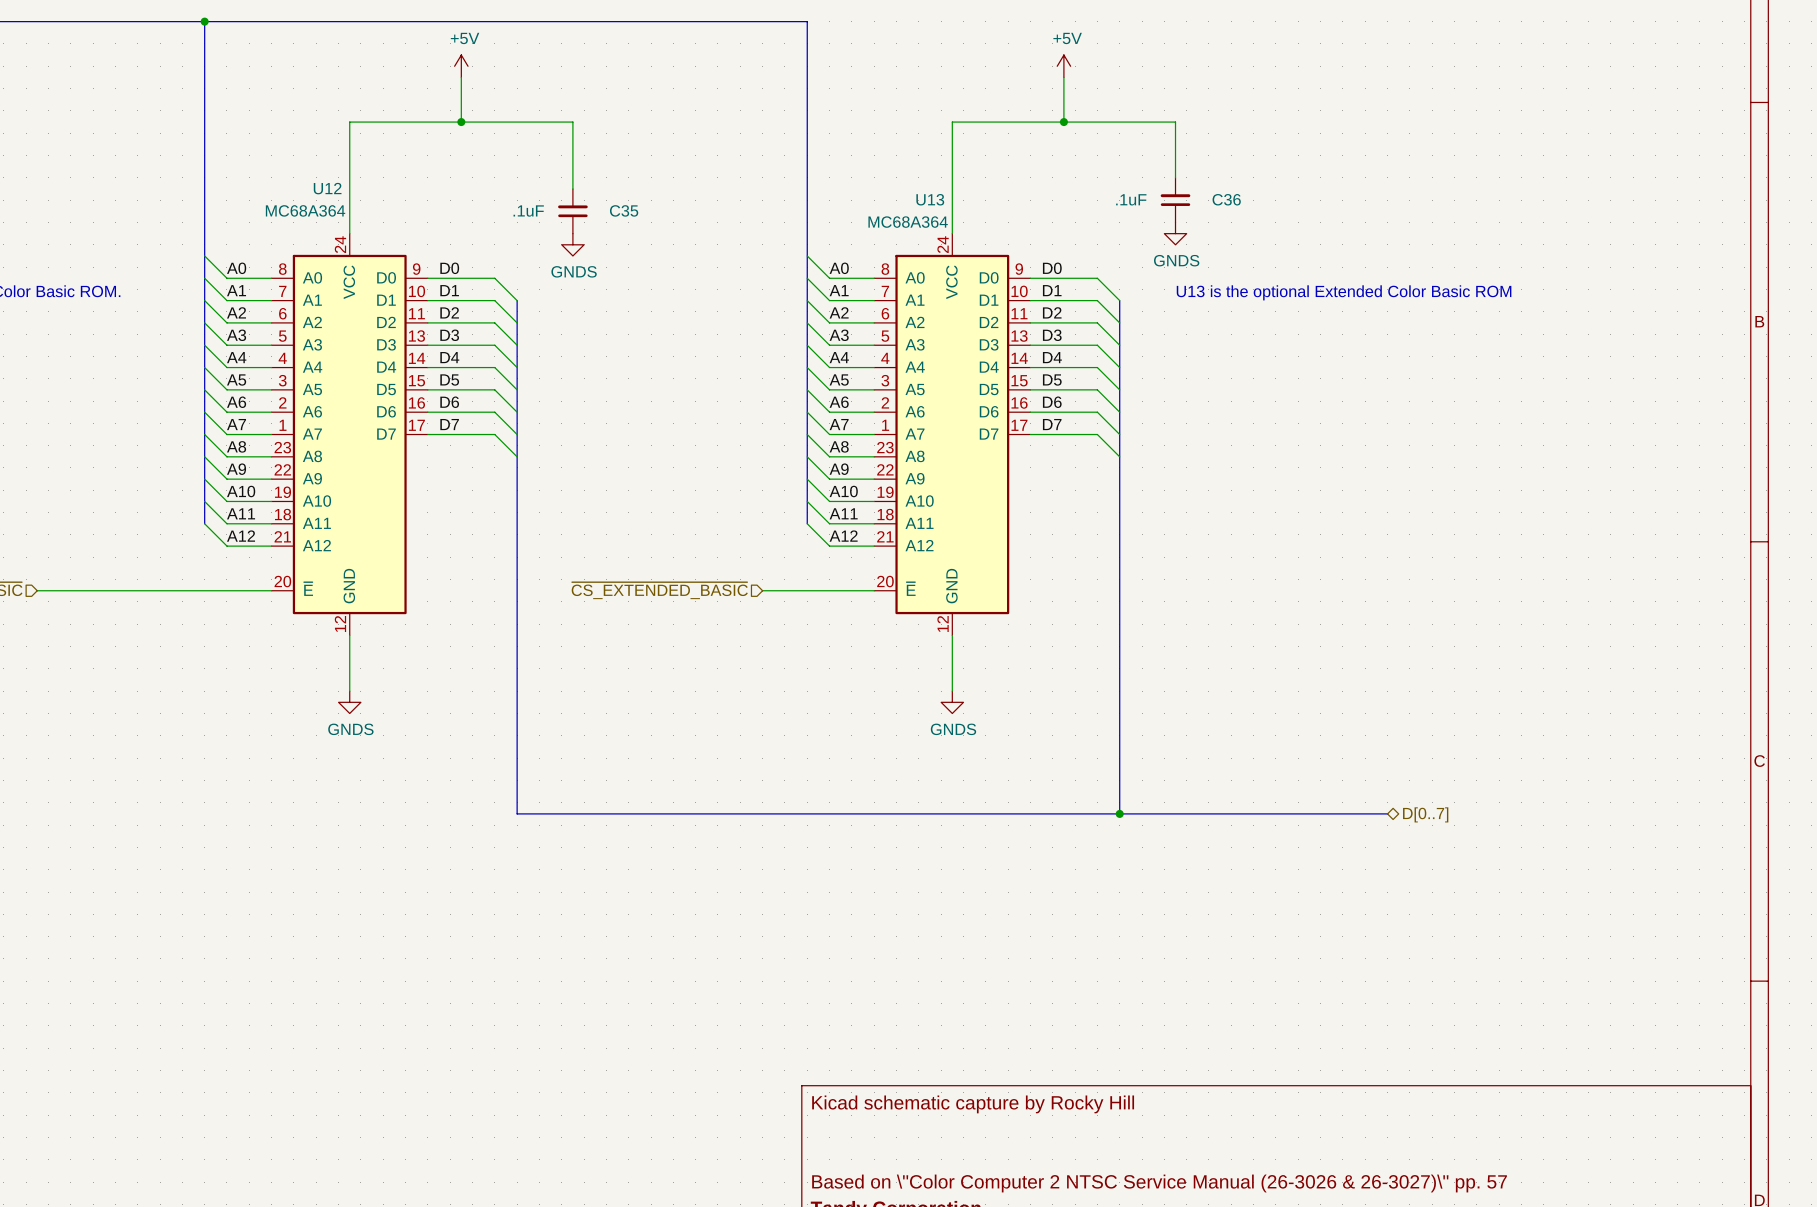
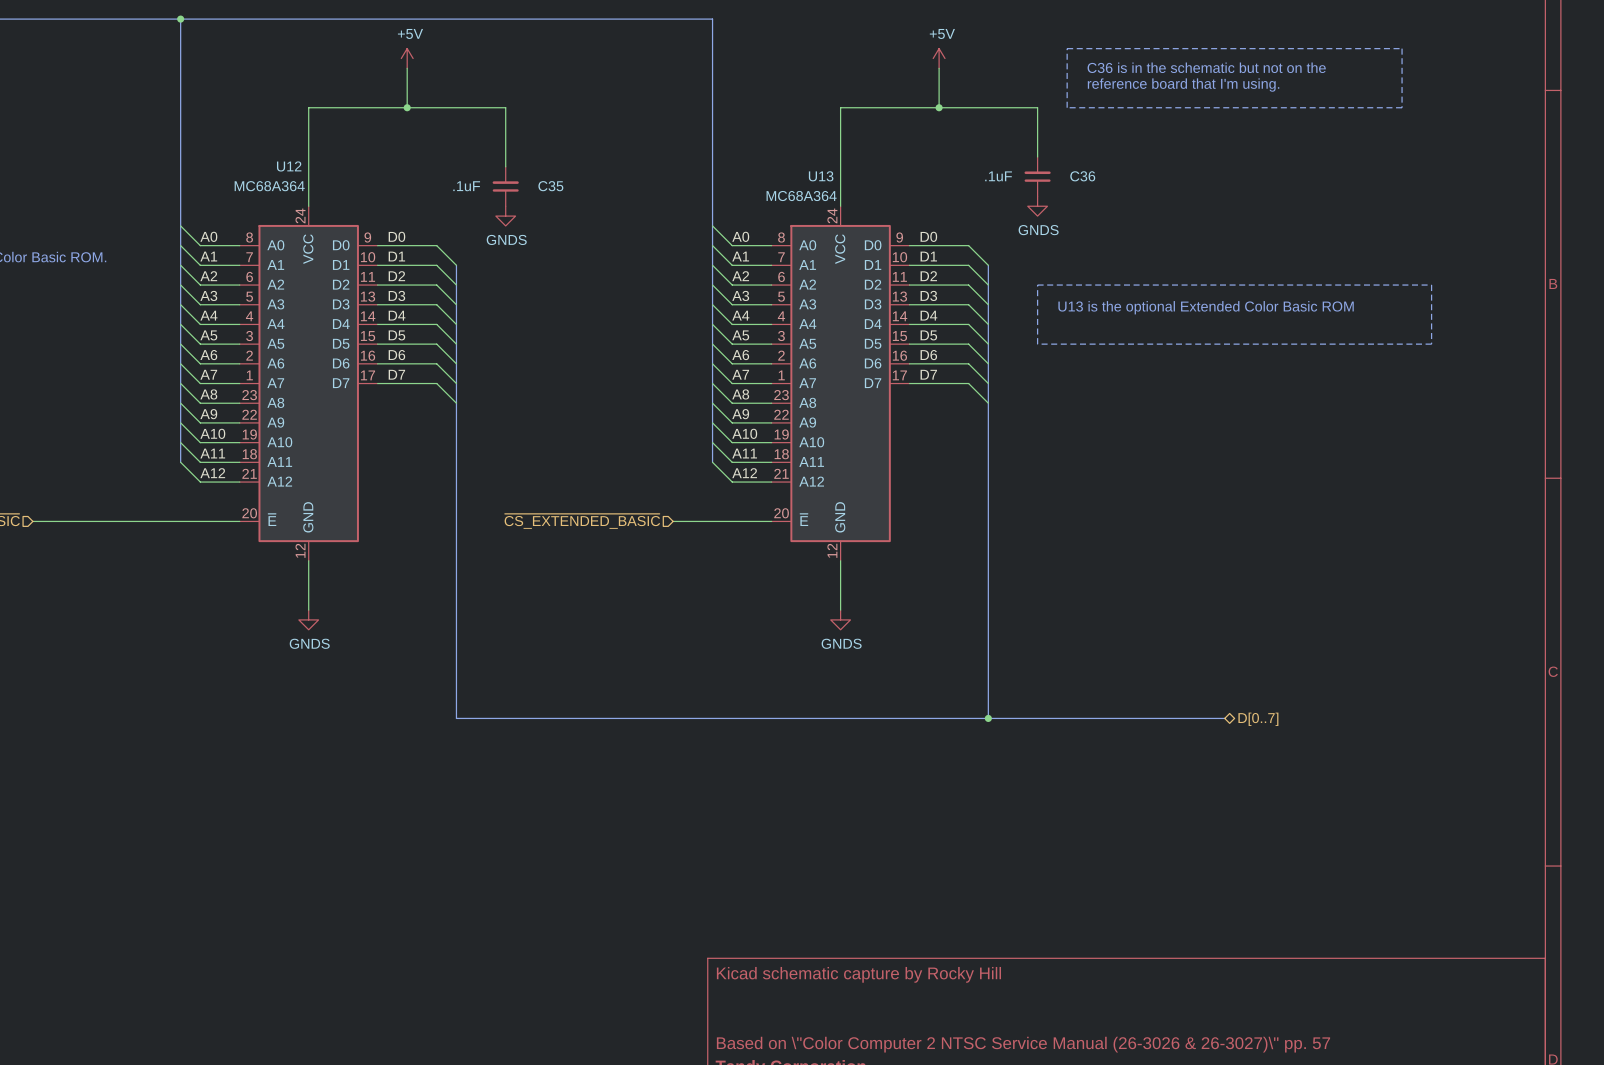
line: none -> (1067, 48) (1067, 107) (1402, 107) (1402, 48) (1067, 48)
text: none -> C36 is in the schematic but not on the (1206, 67)
text: none -> reference board that I'm using. (1183, 85)
text position: U13 is the optional Extended Color Basic ROM (1344, 292) -> U13 is the optional Extended Color Basic ROM (1206, 307)
line: none -> (1037, 285) (1037, 344) (1431, 344) (1431, 285) (1037, 285)

